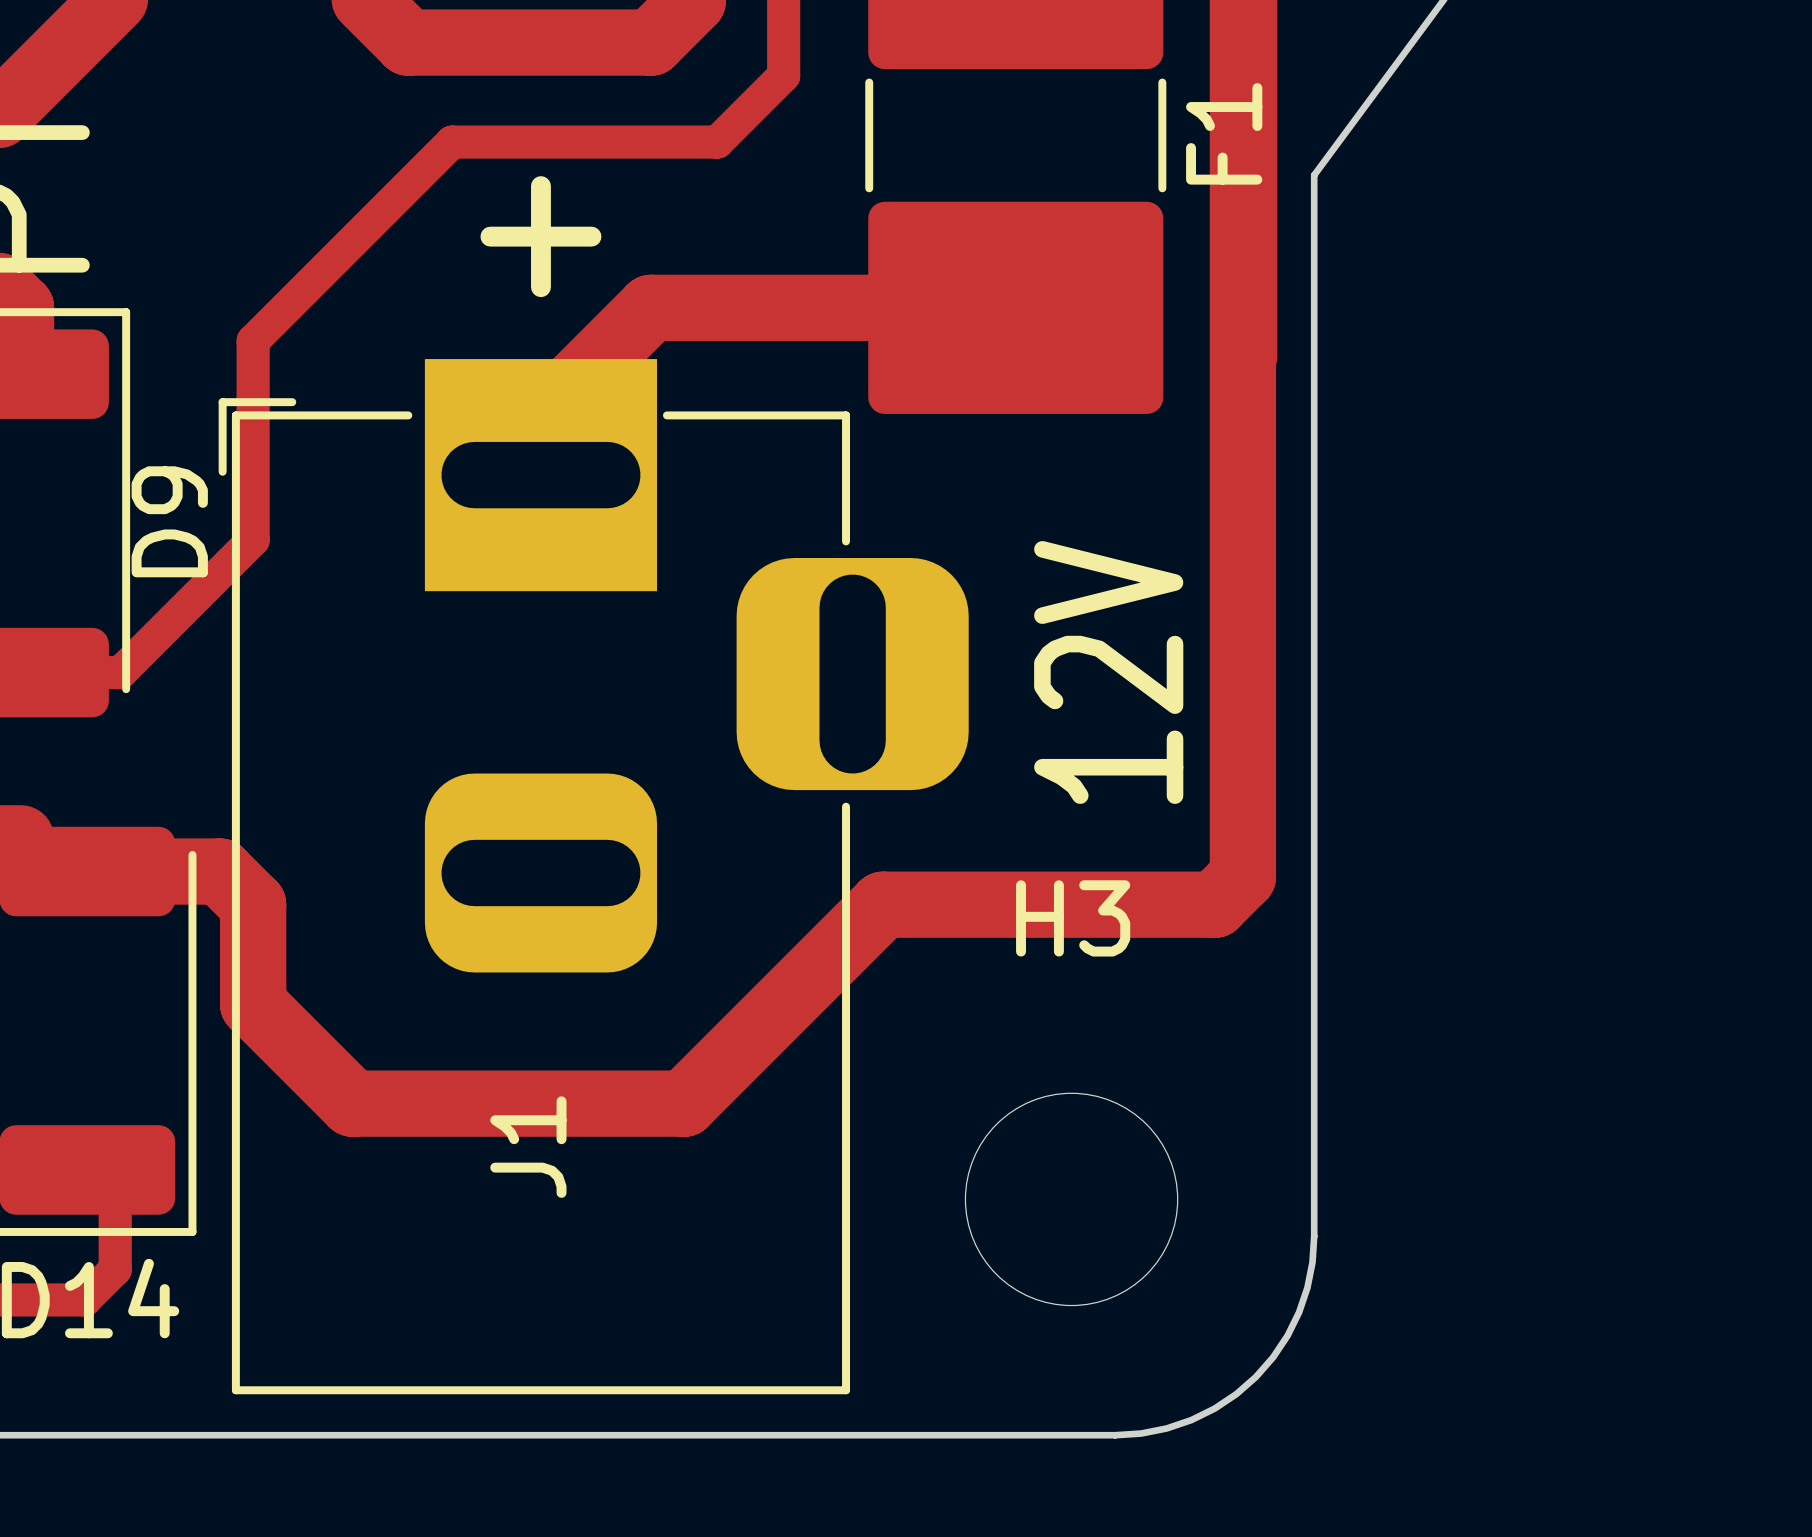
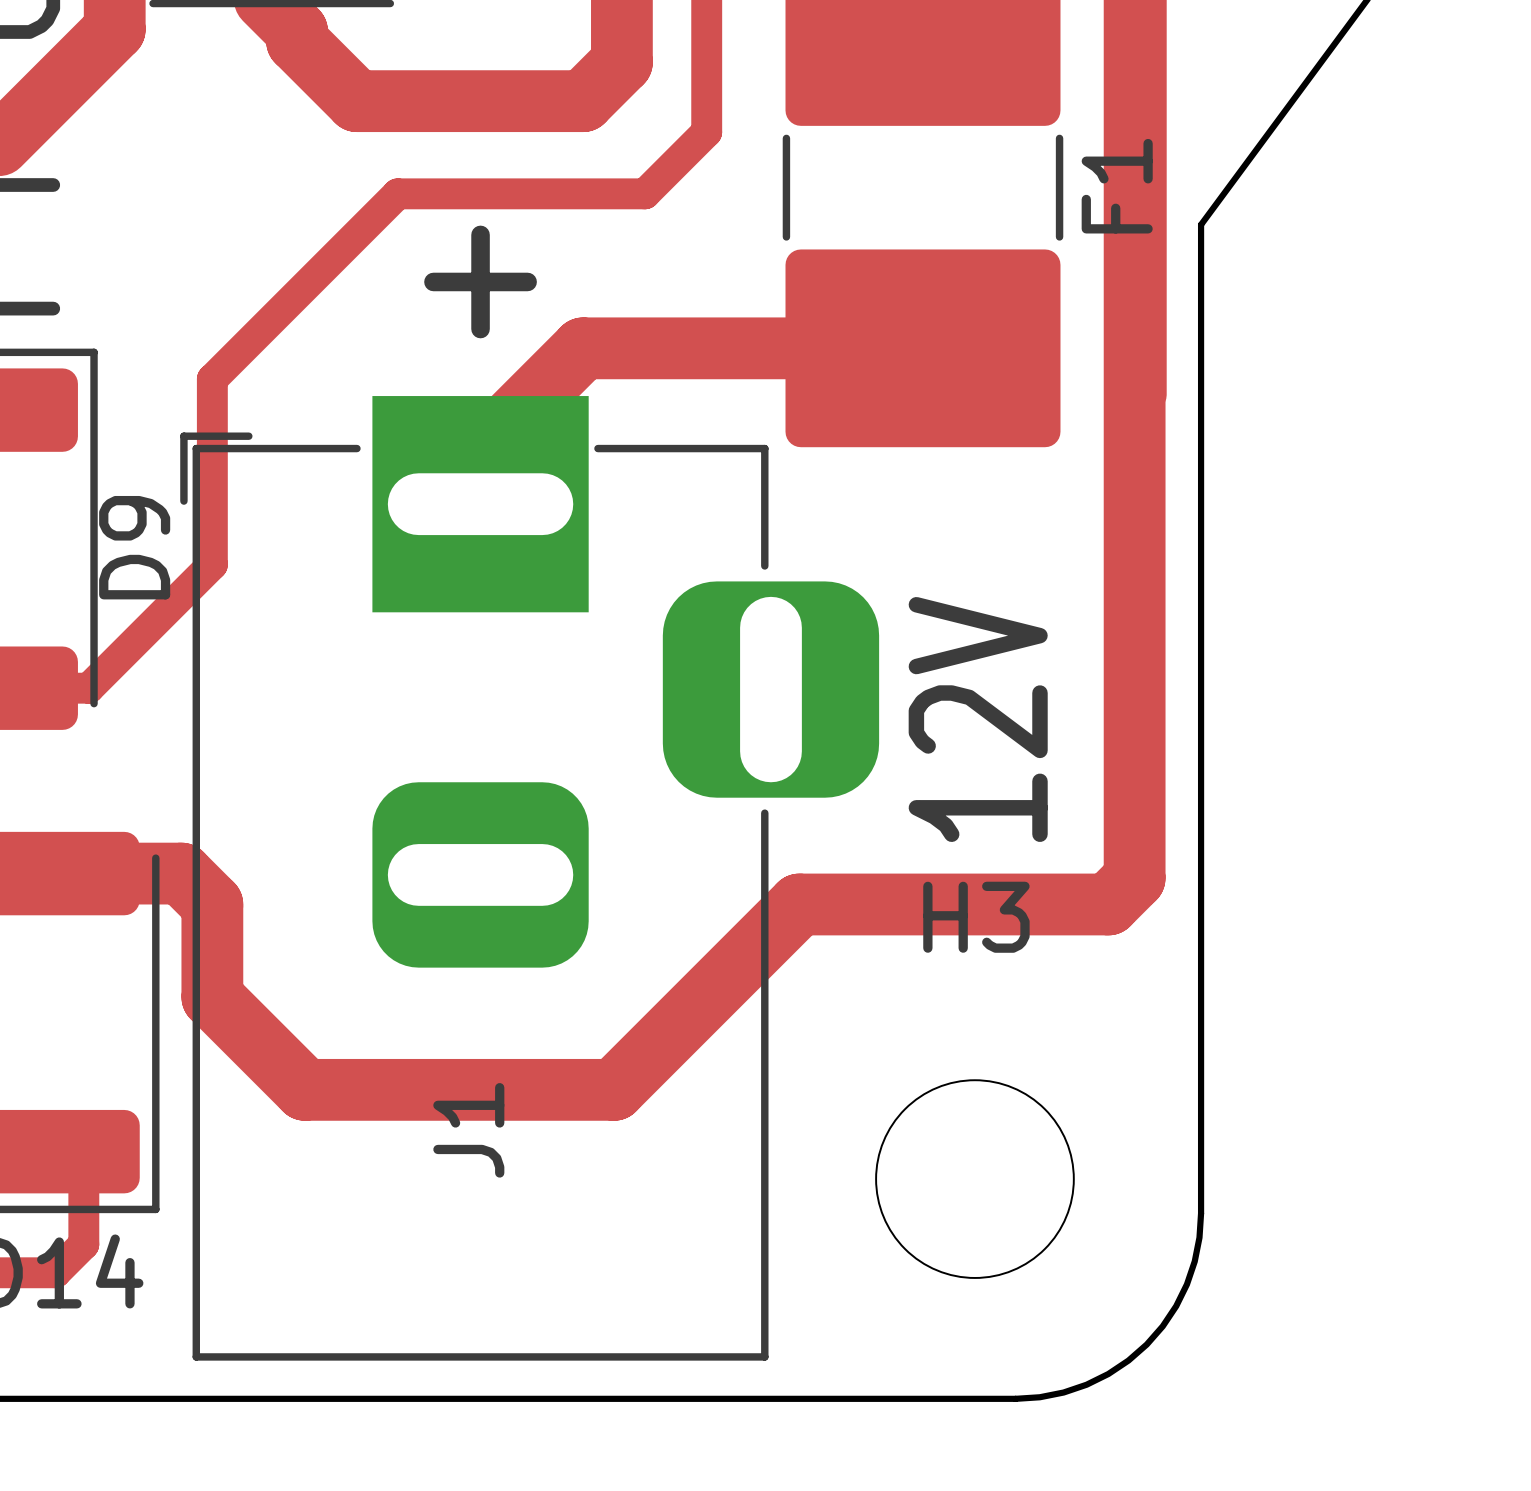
text position: 12V (1108, 672) -> 12V (978, 719)

